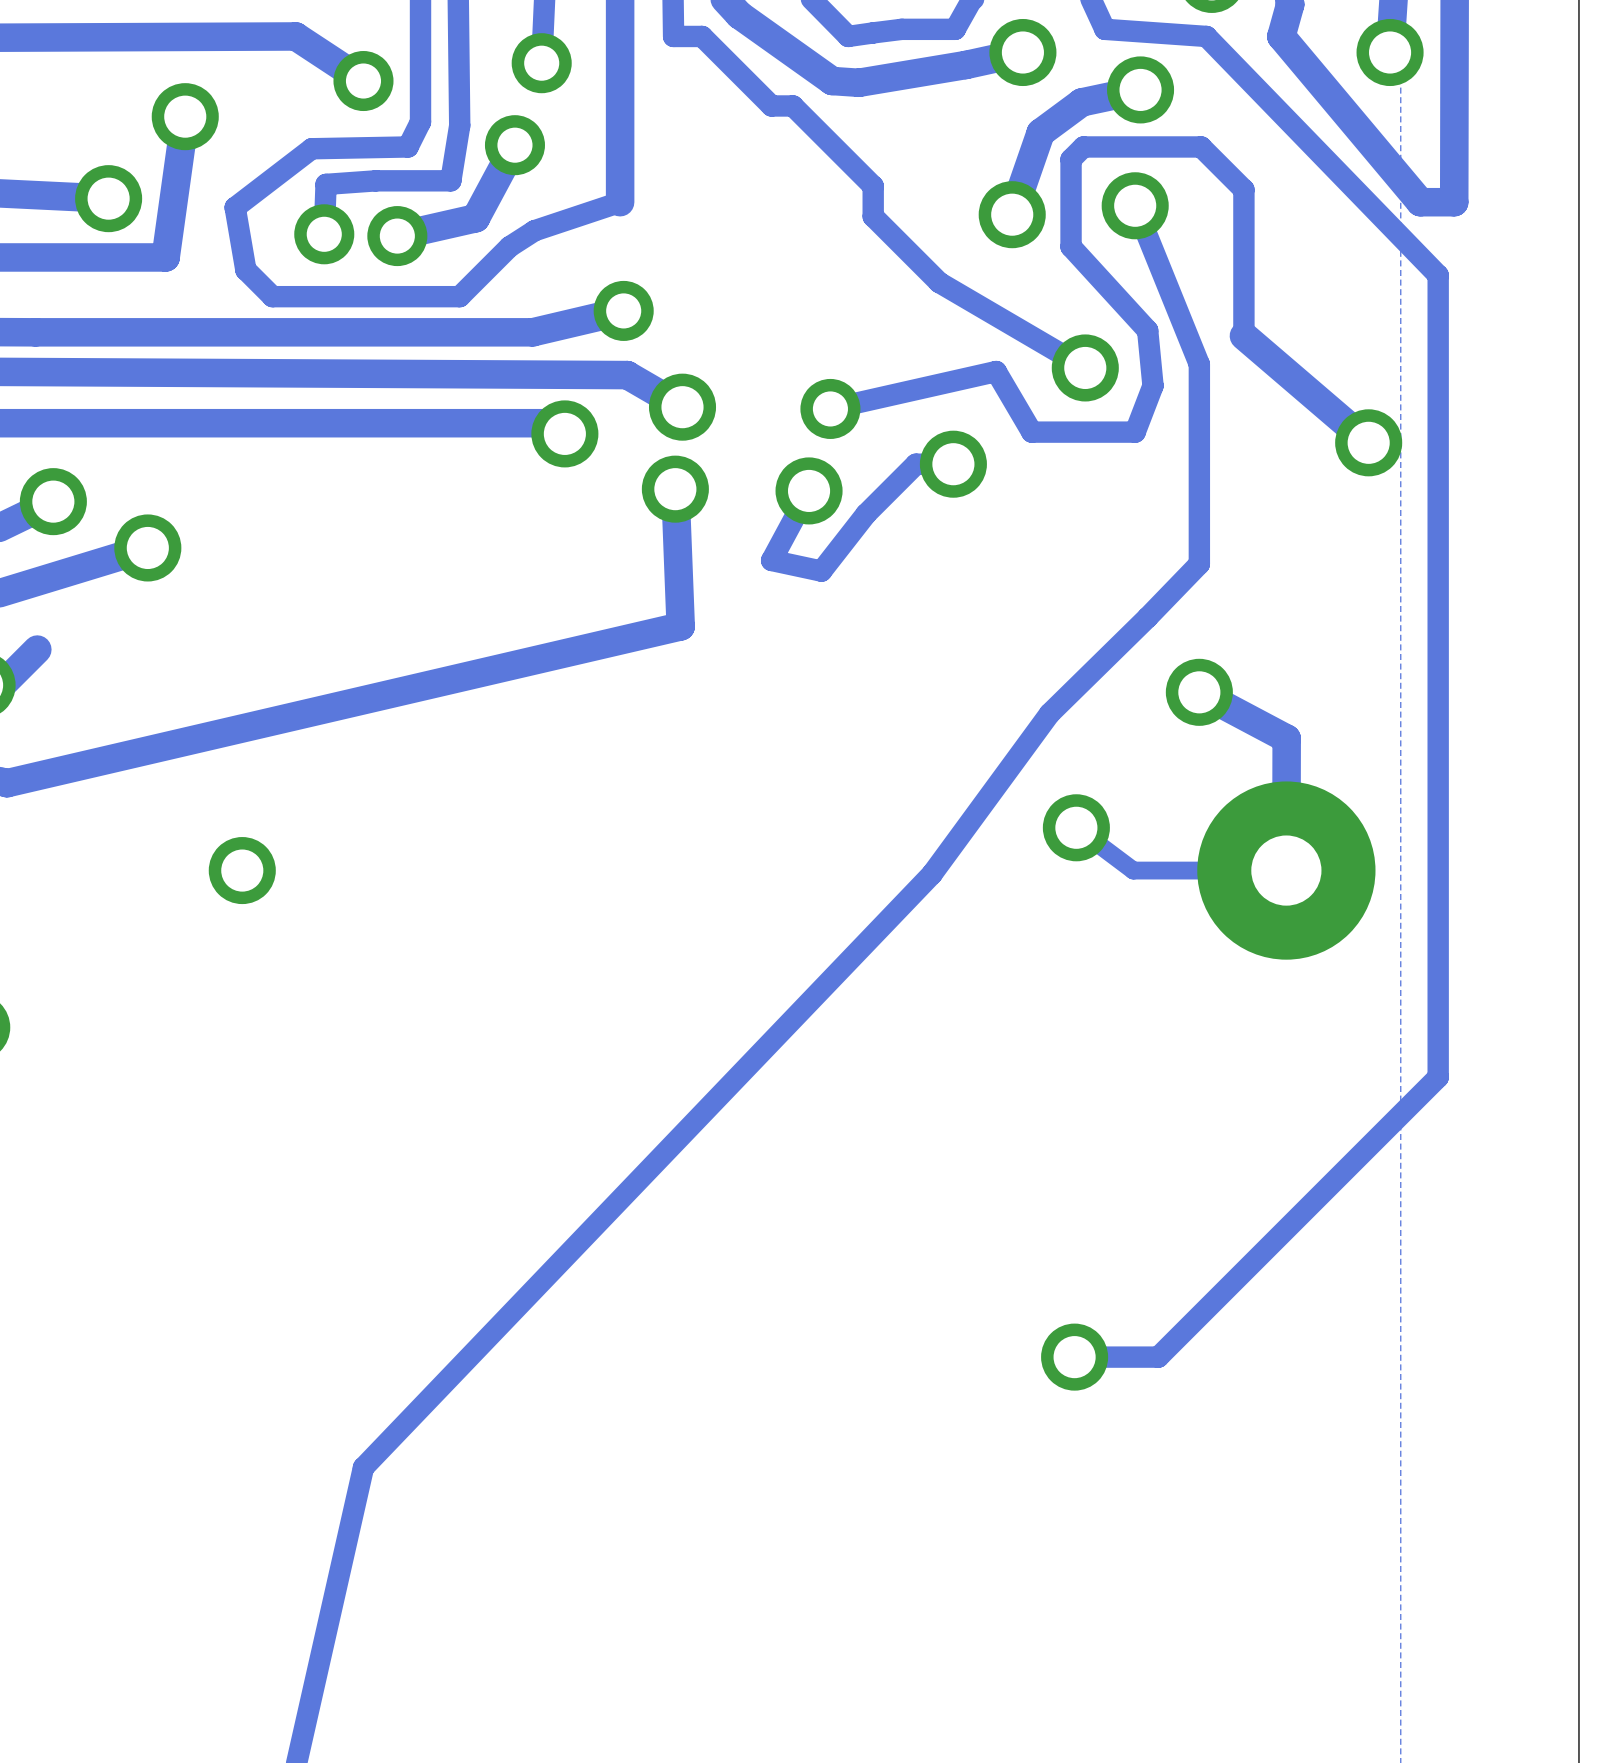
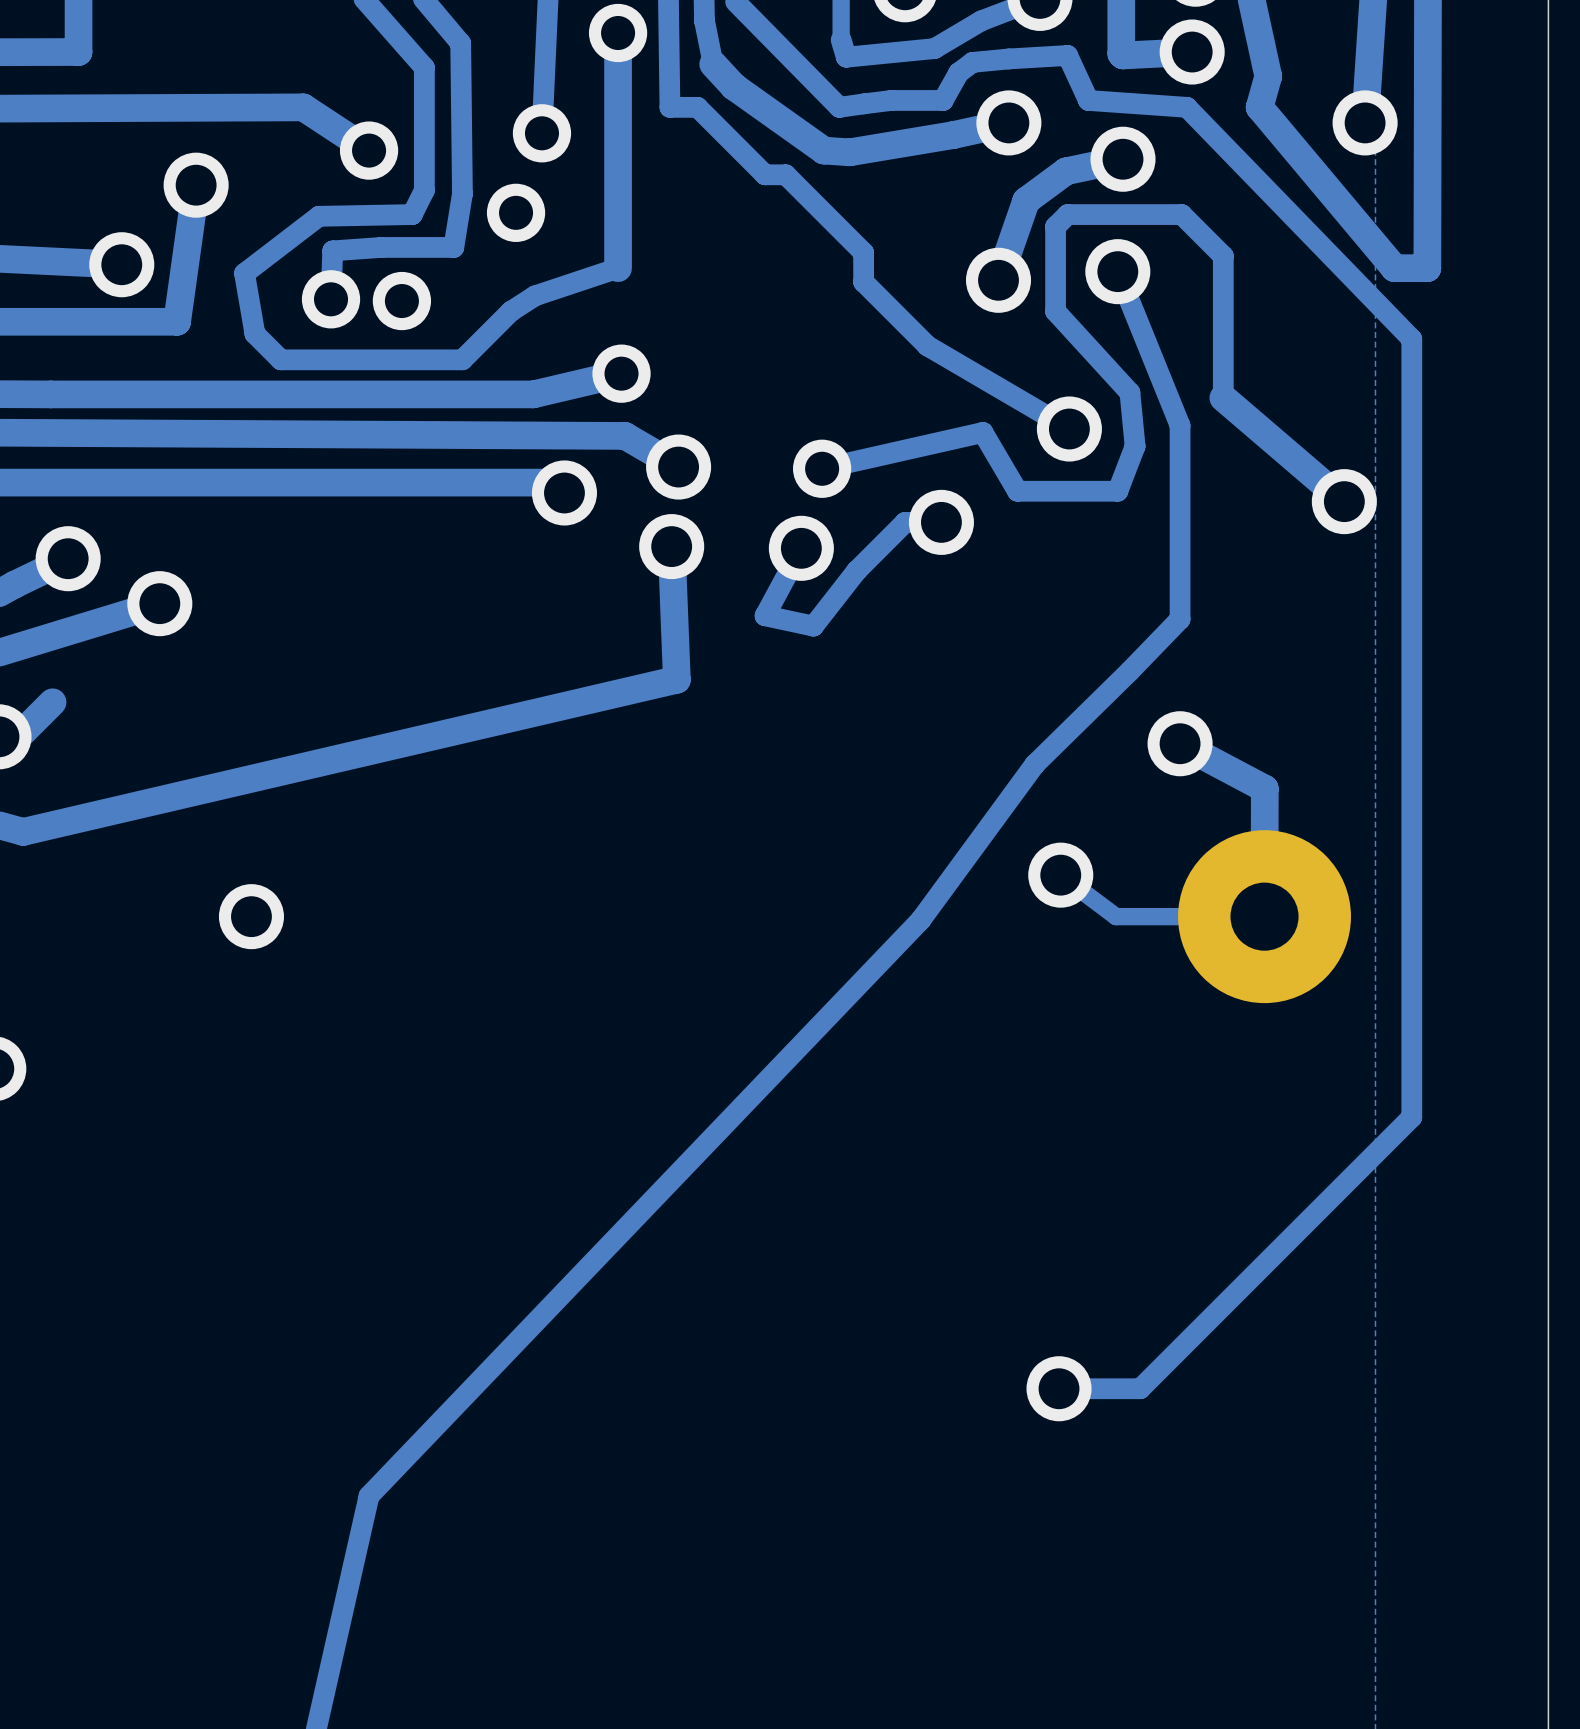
track: (514, 145) (475, 218) (397, 236) -> none

